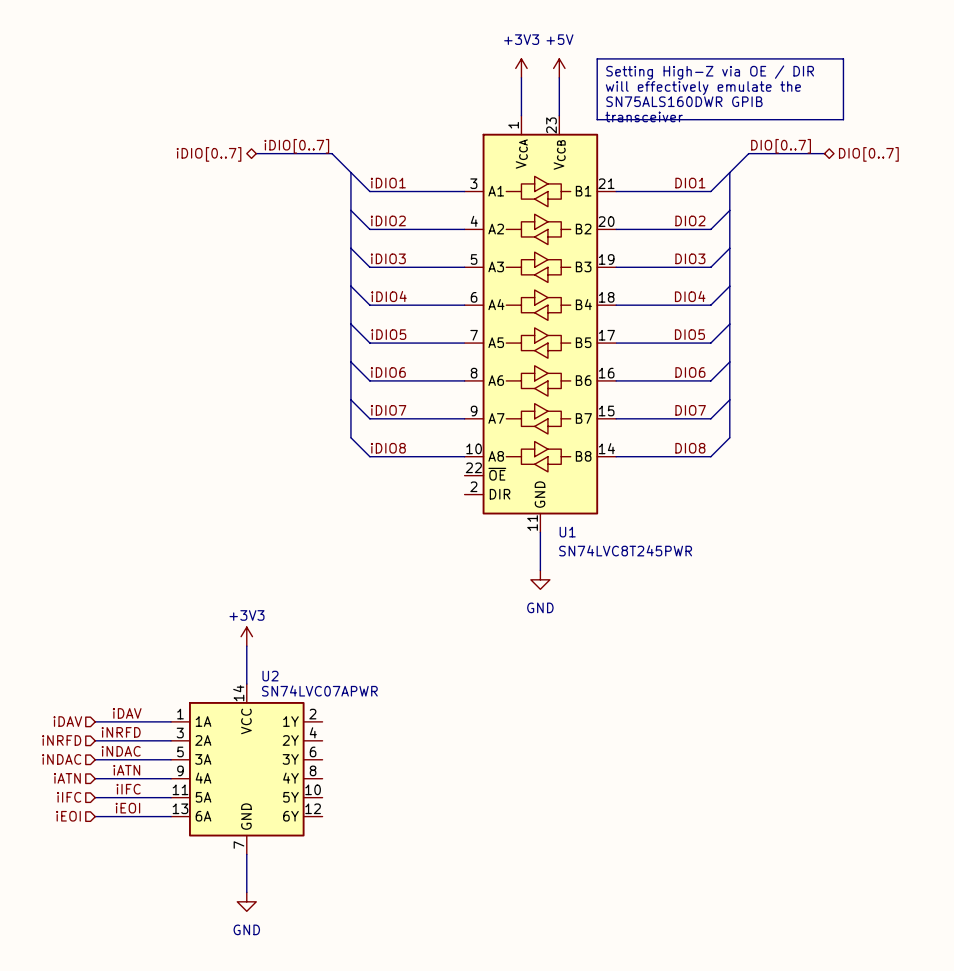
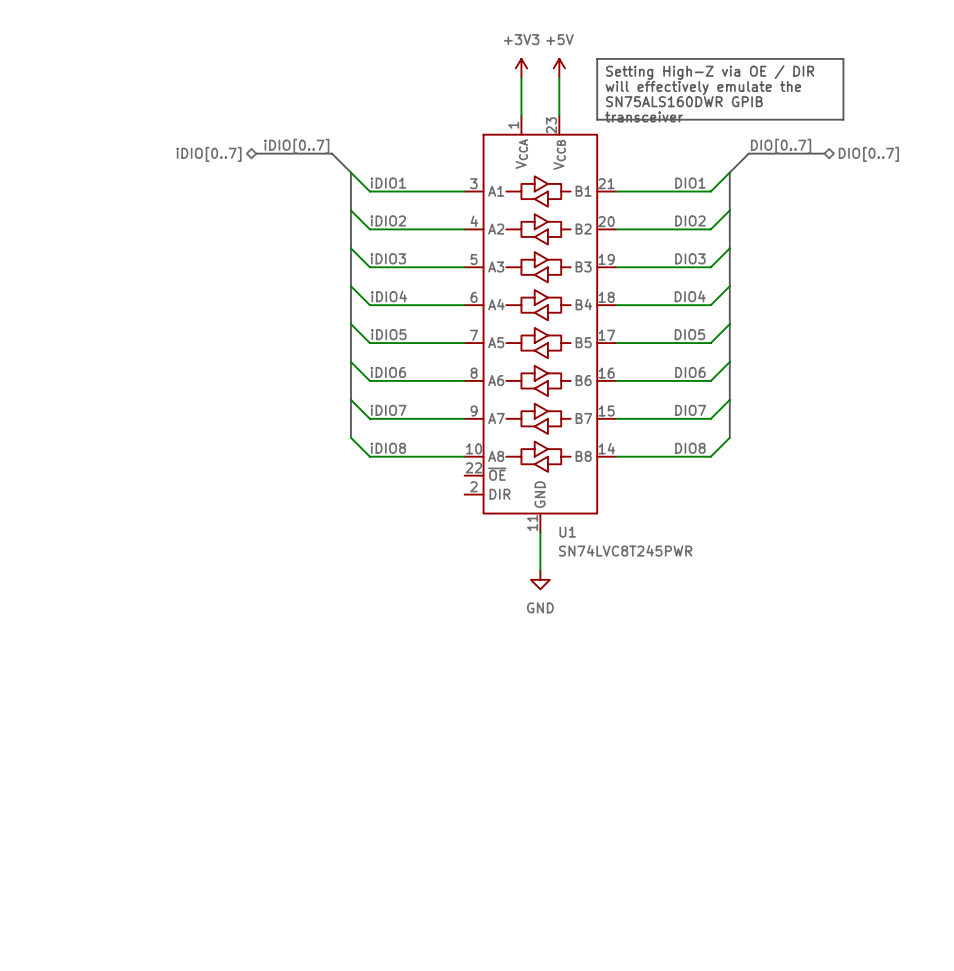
power symbol: +3V3 (246, 636) -> none
wire: (246, 646) (246, 684) -> none
label: iDAV (127, 713) -> none
hierarchical label: iDAV (67, 721) -> none
wire: (95, 721) (171, 721) -> none
label: iNRFD (121, 732) -> none
hierarchical label: iNRFD (61, 740) -> none
wire: (95, 740) (171, 740) -> none
label: iNDAC (121, 751) -> none
hierarchical label: iNDAC (61, 759) -> none
wire: (95, 759) (171, 759) -> none
U2: SN74LVC07APWR (246, 769) -> none
label: iATN (126, 770) -> none
hierarchical label: iATN (67, 778) -> none
wire: (95, 778) (171, 778) -> none
label: iIFC (128, 789) -> none
hierarchical label: iIFC (69, 797) -> none
wire: (95, 797) (171, 797) -> none
label: iEOI (127, 808) -> none
hierarchical label: iEOI (68, 816) -> none
wire: (95, 816) (171, 816) -> none
wire: (246, 854) (246, 892) -> none
power symbol: GND (246, 901) -> none

